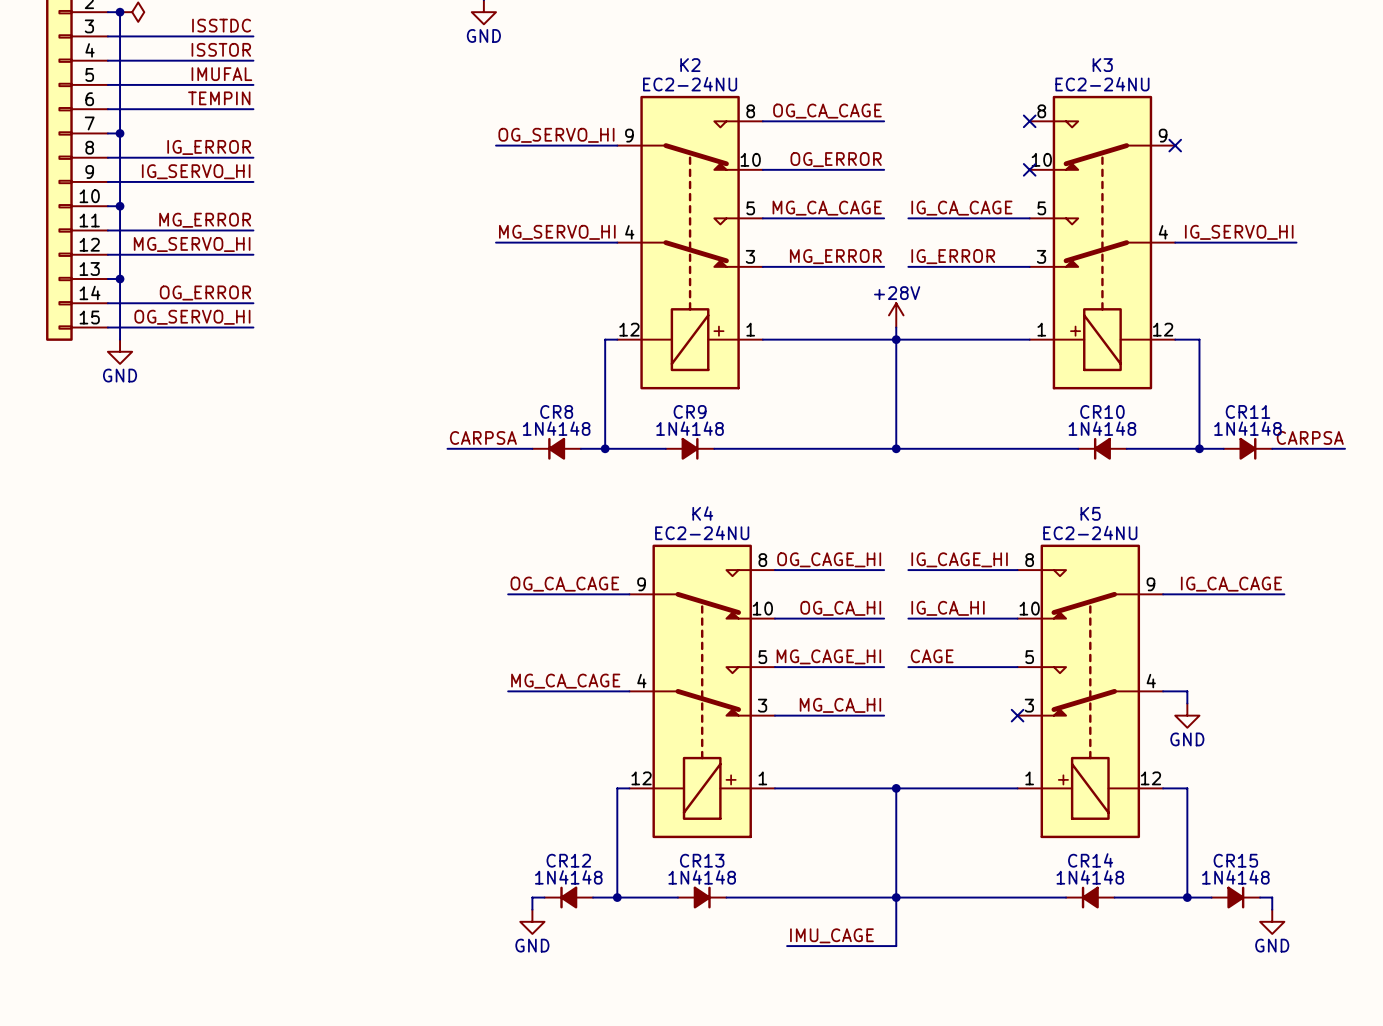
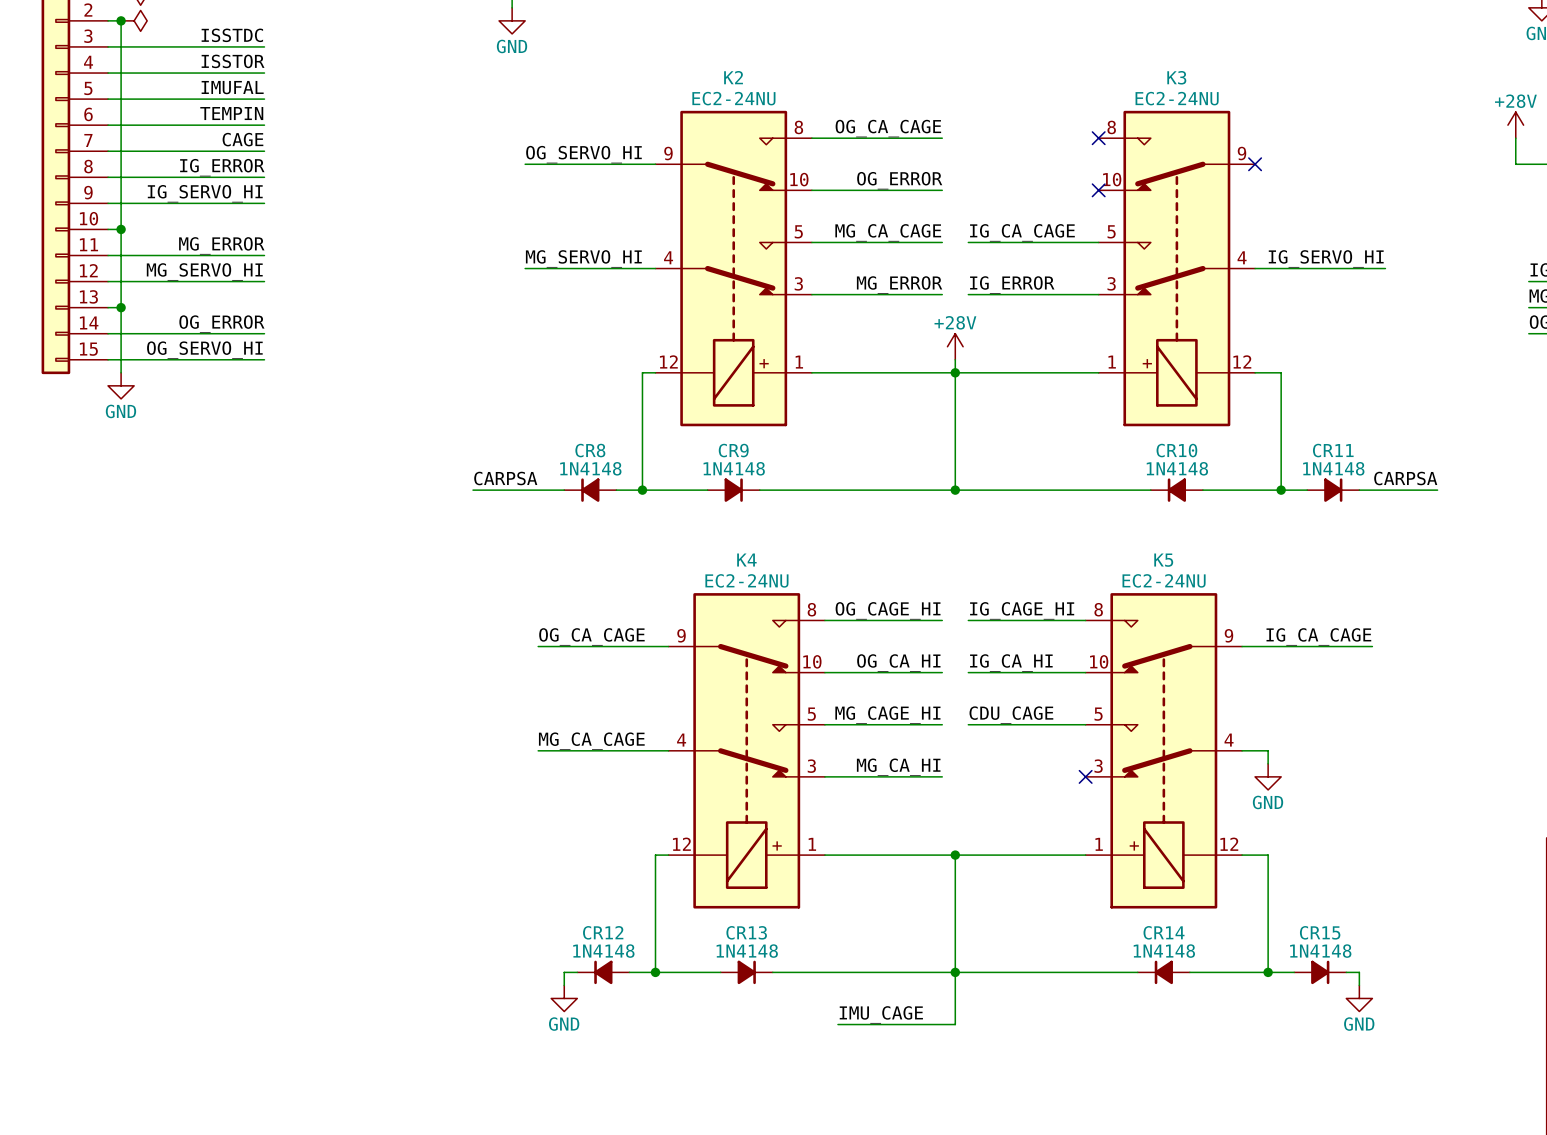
label: none -> CAGE (242, 139)
wire: none -> (121, 151) (264, 151)
junction: (120, 133) -> none
label: CAGE (932, 656) -> CDU_CAGE (1011, 715)

